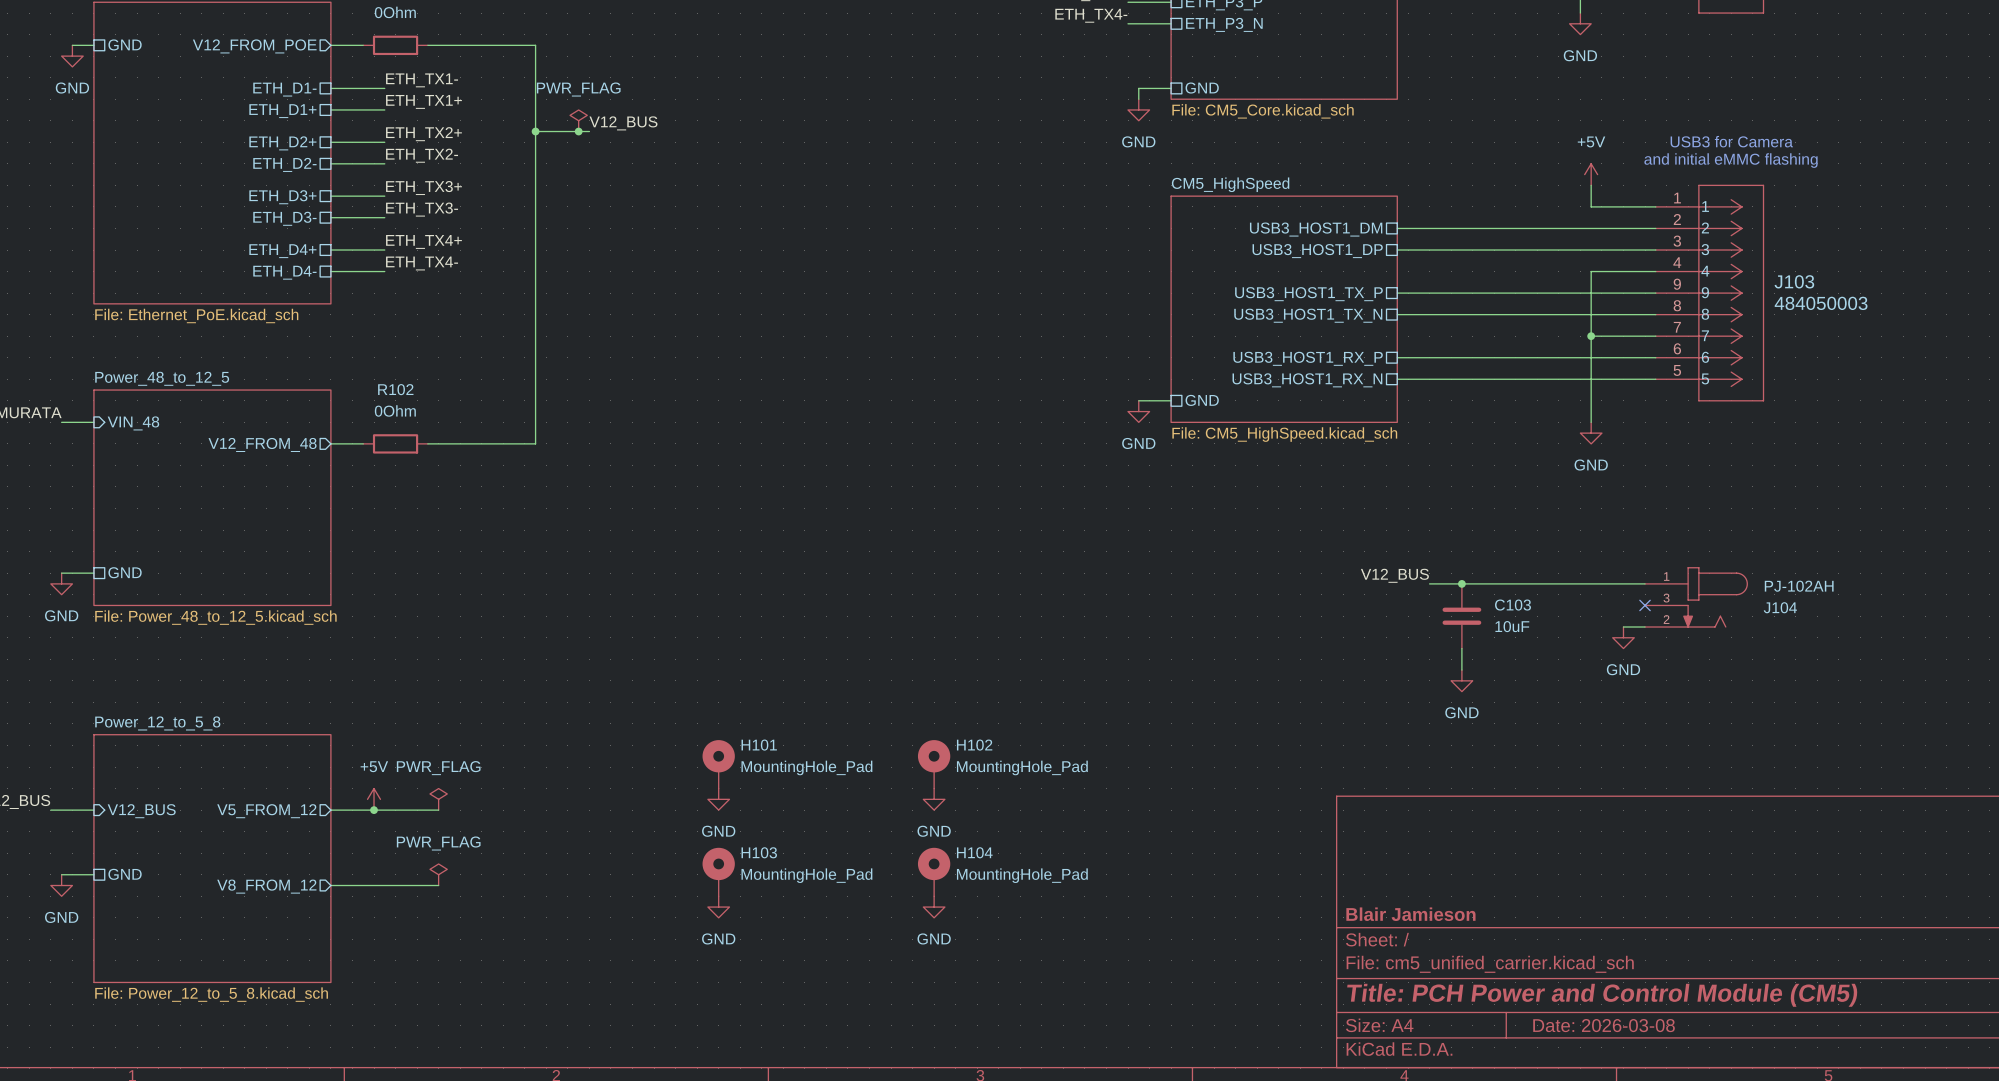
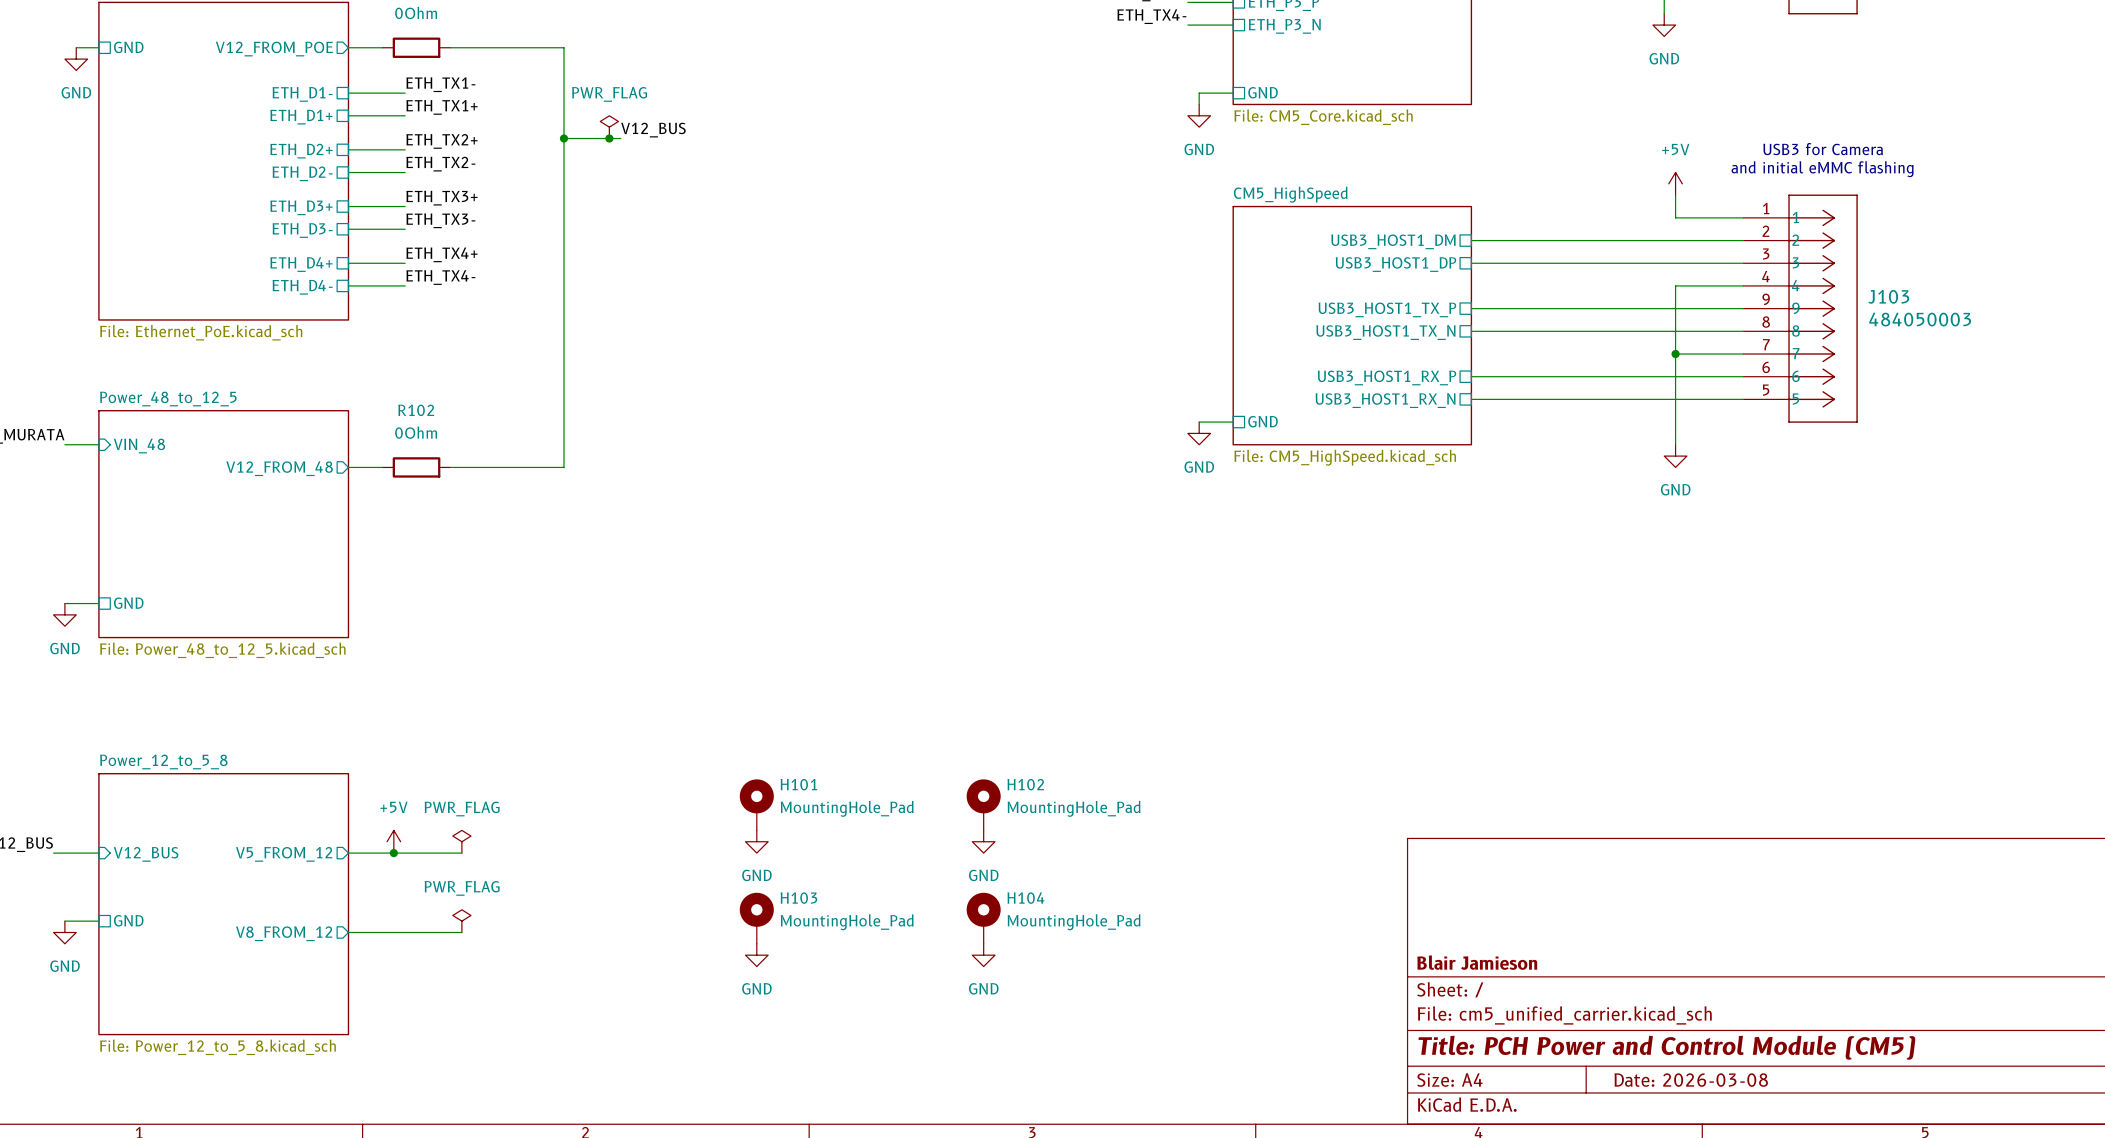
label: V12_BUS (1394, 575) -> none
wire: (1429, 583) (1645, 583) -> none
junction: (1461, 583) -> none
J104: PJ-102AH (1696, 597) -> none
no-connect mark: (1645, 605) -> none
C103: 10uF (1461, 616) -> none
wire: (1623, 627) (1645, 627) -> none
power symbol: GND (1623, 637) -> none
wire: (1461, 648) (1461, 670) -> none
power symbol: GND (1461, 680) -> none

